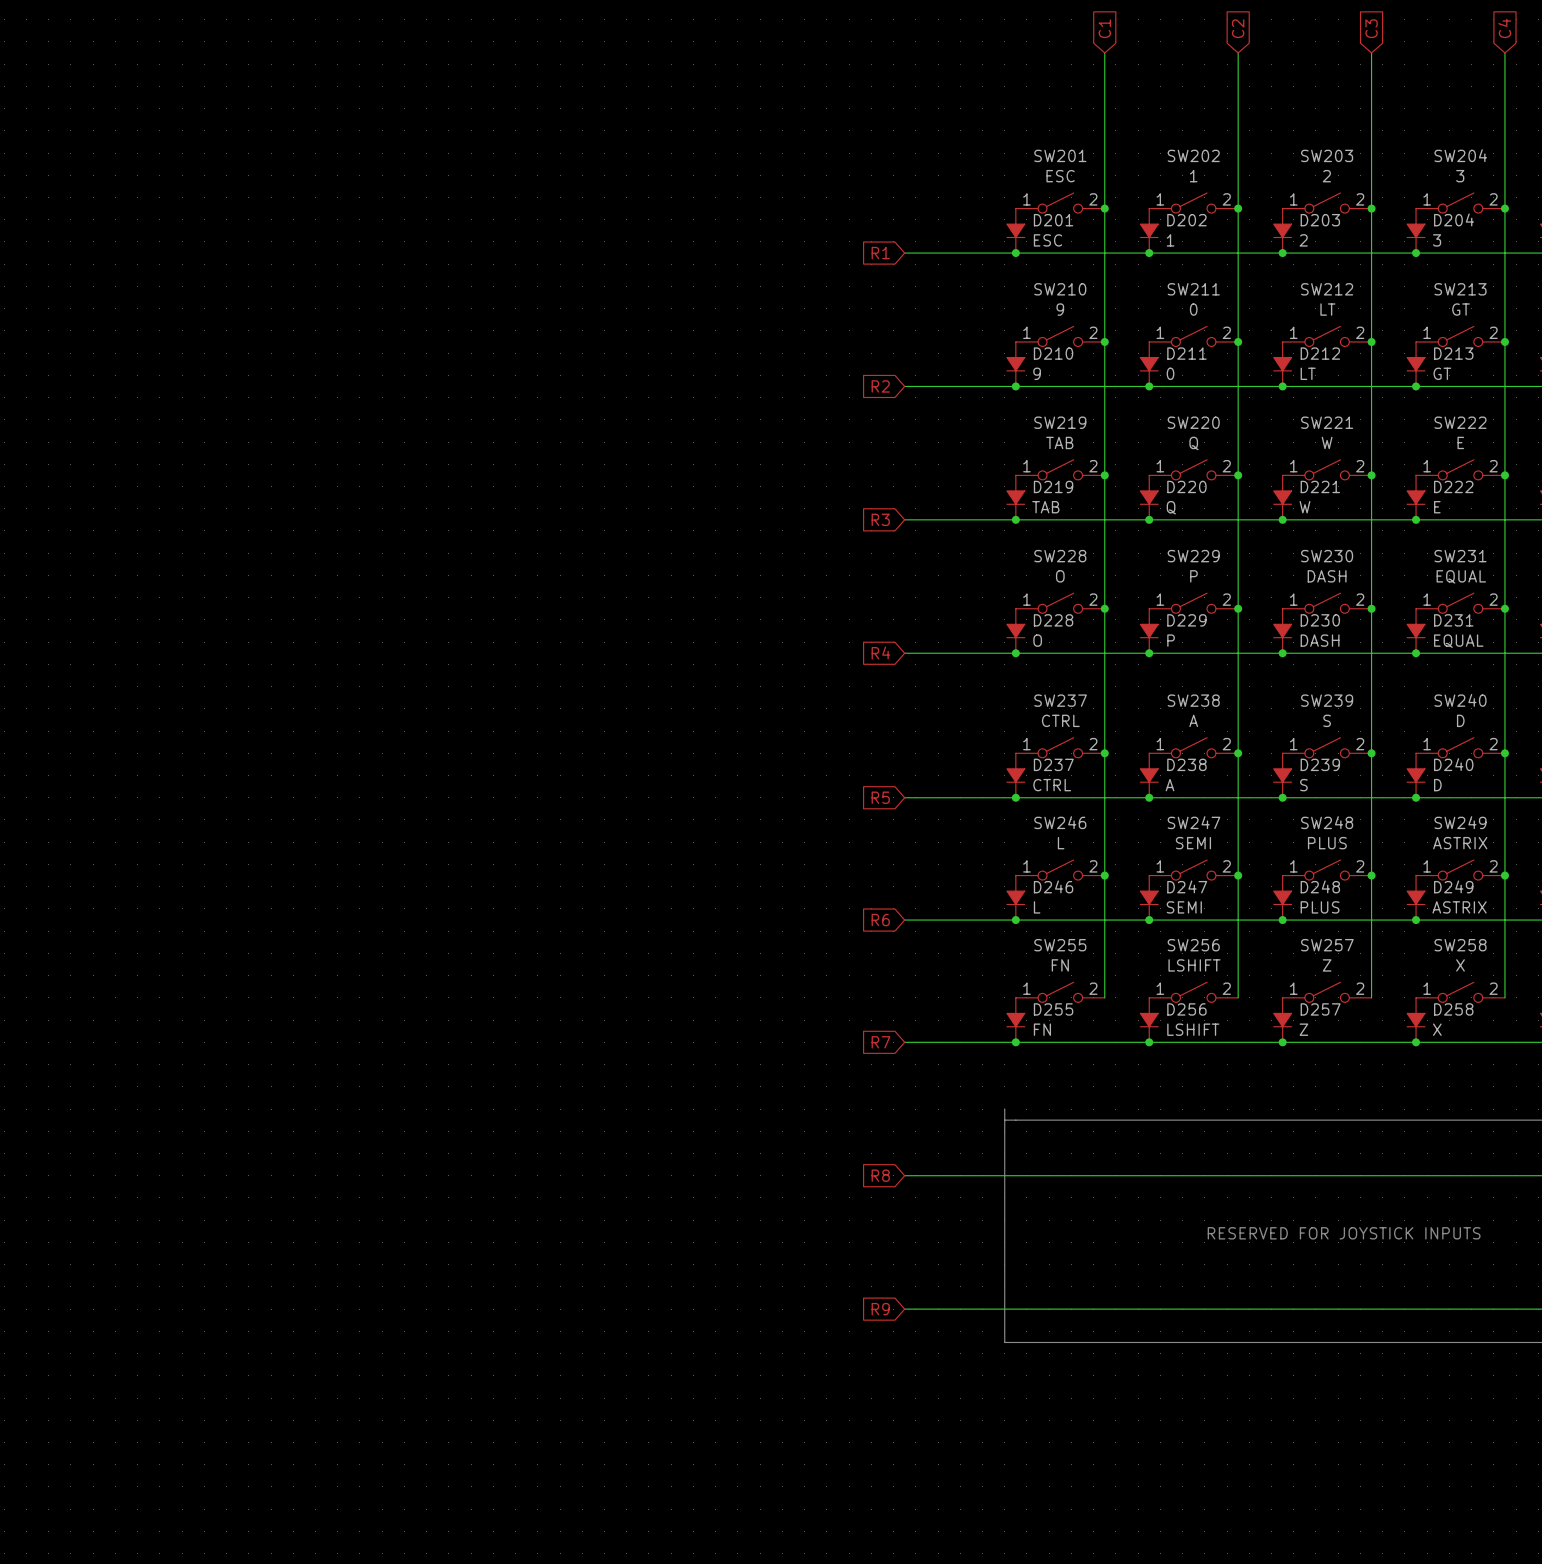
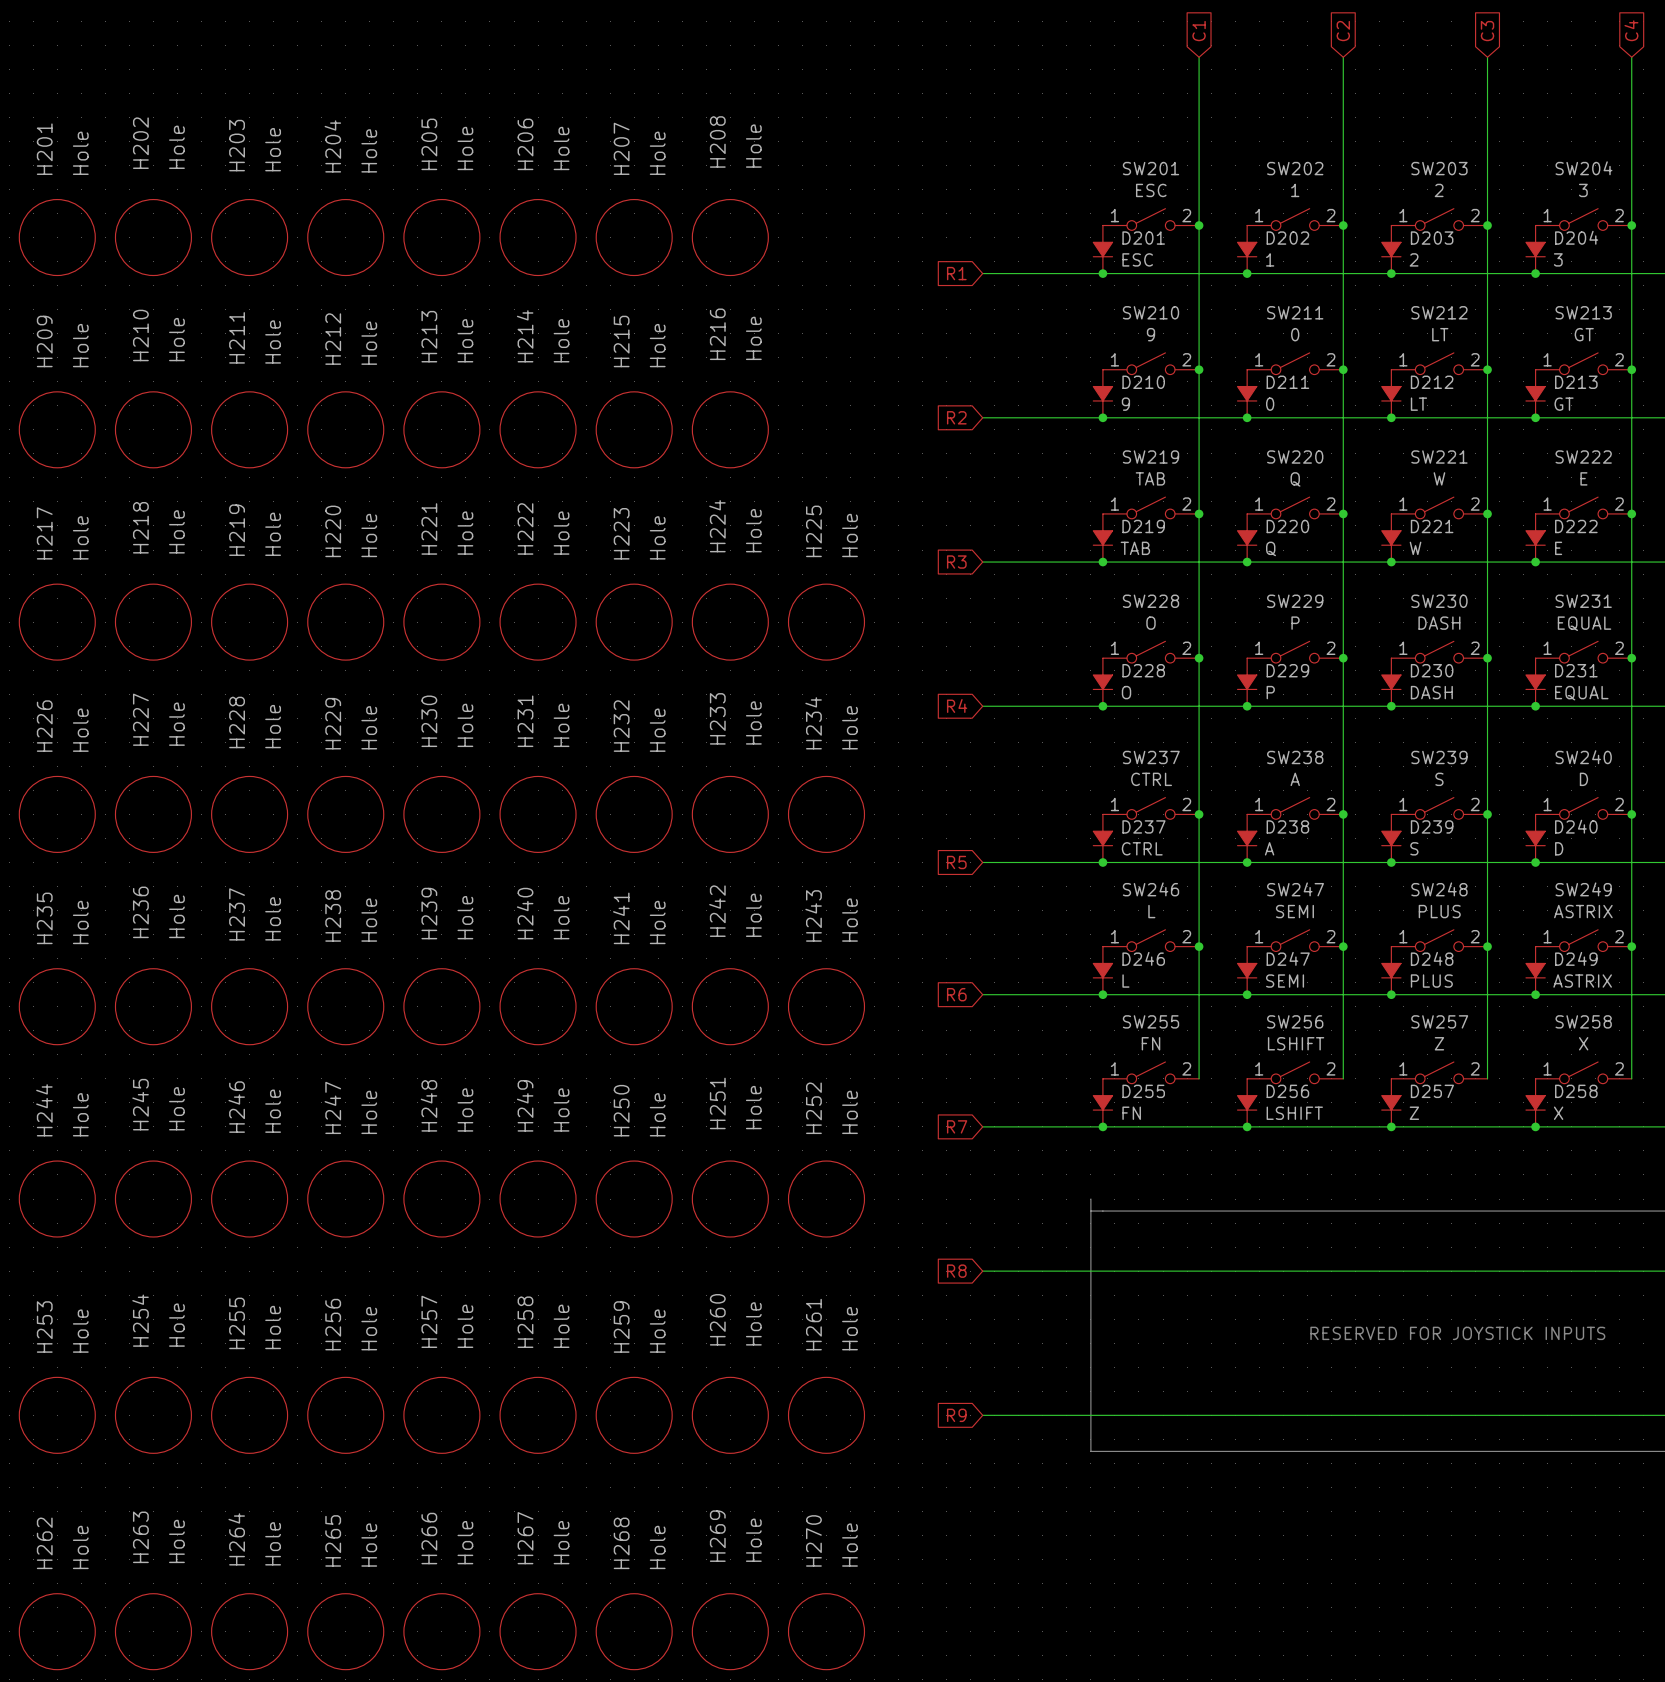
H201: none -> Hole (57, 237)
H202: none -> Hole (153, 237)
H203: none -> Hole (249, 237)
H204: none -> Hole (345, 237)
H205: none -> Hole (441, 237)
H206: none -> Hole (538, 237)
H207: none -> Hole (634, 237)
H208: none -> Hole (730, 237)
H209: none -> Hole (57, 429)
H210: none -> Hole (153, 429)
H211: none -> Hole (249, 429)
H212: none -> Hole (345, 429)
H213: none -> Hole (441, 429)
H214: none -> Hole (538, 429)
H215: none -> Hole (634, 429)
H216: none -> Hole (730, 429)
H217: none -> Hole (57, 622)
H218: none -> Hole (153, 622)
H219: none -> Hole (249, 622)
H220: none -> Hole (345, 622)
H221: none -> Hole (441, 622)
H222: none -> Hole (538, 622)
H223: none -> Hole (634, 622)
H224: none -> Hole (730, 622)
H225: none -> Hole (826, 622)
H226: none -> Hole (57, 814)
H227: none -> Hole (153, 814)
H228: none -> Hole (249, 814)
H229: none -> Hole (345, 814)
H230: none -> Hole (441, 814)
H231: none -> Hole (538, 814)
H232: none -> Hole (634, 814)
H233: none -> Hole (730, 814)
H234: none -> Hole (826, 814)
H235: none -> Hole (57, 1006)
H236: none -> Hole (153, 1006)
H237: none -> Hole (249, 1006)
H238: none -> Hole (345, 1006)
H239: none -> Hole (441, 1006)
H240: none -> Hole (538, 1006)
H241: none -> Hole (634, 1006)
H242: none -> Hole (730, 1006)
H243: none -> Hole (826, 1006)
H244: none -> Hole (57, 1199)
H245: none -> Hole (153, 1199)
H246: none -> Hole (249, 1199)
H247: none -> Hole (345, 1199)
H248: none -> Hole (441, 1199)
H249: none -> Hole (538, 1199)
H250: none -> Hole (634, 1199)
H251: none -> Hole (730, 1199)
H252: none -> Hole (826, 1199)
H253: none -> Hole (57, 1415)
H254: none -> Hole (153, 1415)
H255: none -> Hole (249, 1415)
H256: none -> Hole (345, 1415)
H257: none -> Hole (441, 1415)
H258: none -> Hole (538, 1415)
H259: none -> Hole (634, 1415)
H260: none -> Hole (730, 1415)
H261: none -> Hole (826, 1415)
H262: none -> Hole (57, 1631)
H263: none -> Hole (153, 1631)
H264: none -> Hole (249, 1631)
H265: none -> Hole (345, 1631)
H266: none -> Hole (441, 1631)
H267: none -> Hole (538, 1631)
H268: none -> Hole (634, 1631)
H269: none -> Hole (730, 1631)
H270: none -> Hole (826, 1631)

